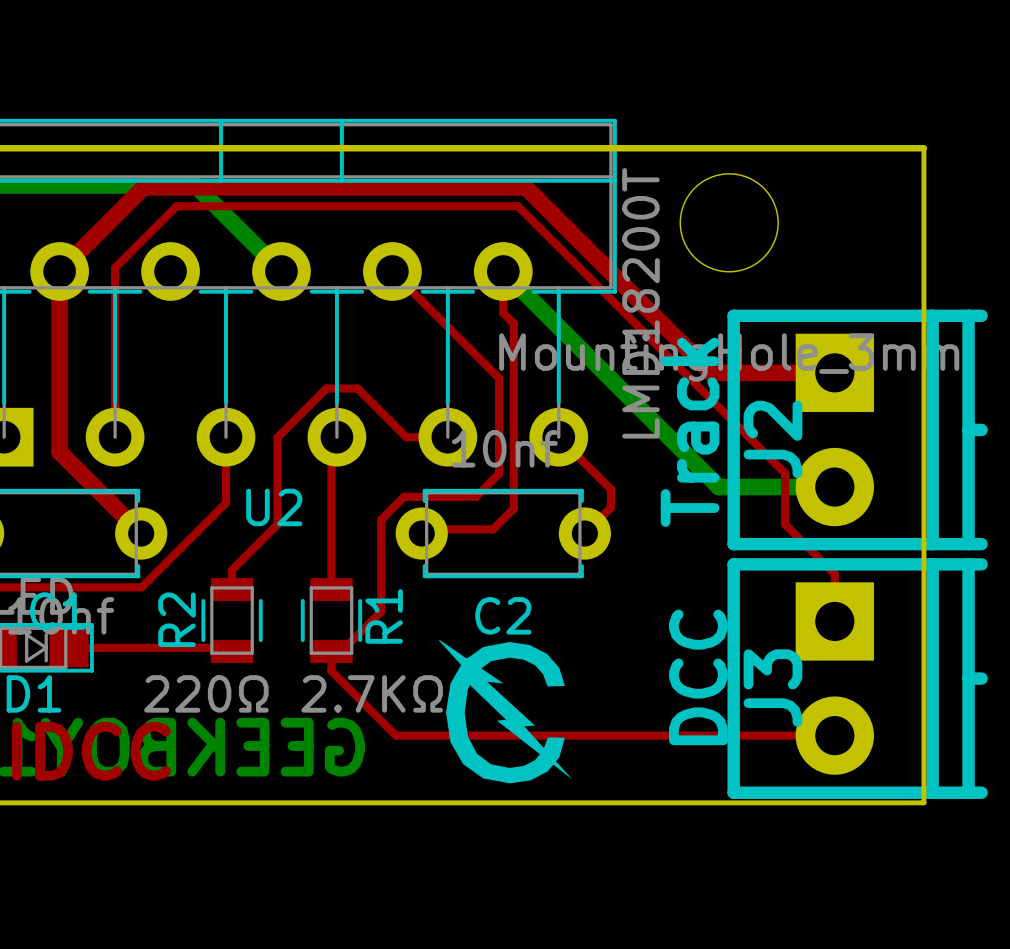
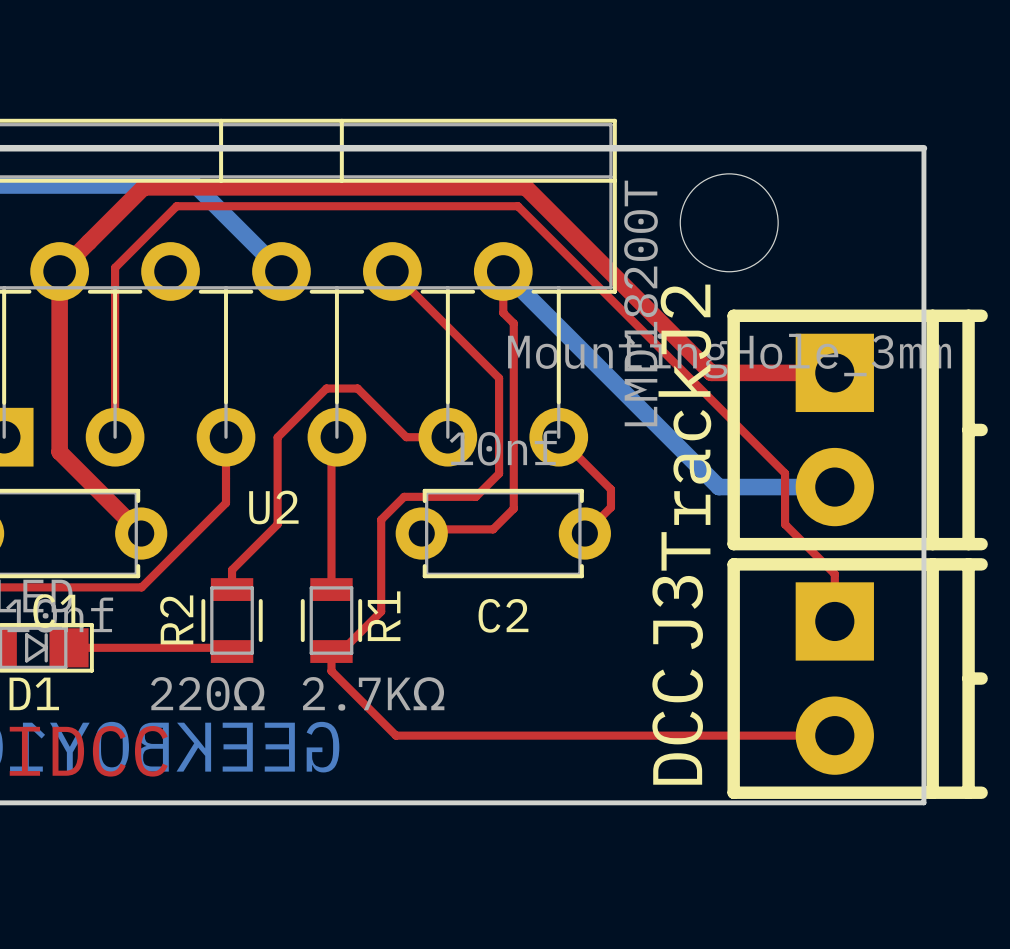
J2 value position: Track (690, 432) -> Track (684, 467)
J2 name position: J2 (772, 439) -> J2 (685, 321)
drawing: [438, 639, 573, 784] -> none
J3 value position: DCC (698, 677) -> DCC (677, 727)
J3 name position: J3 (772, 688) -> J3 (677, 612)

